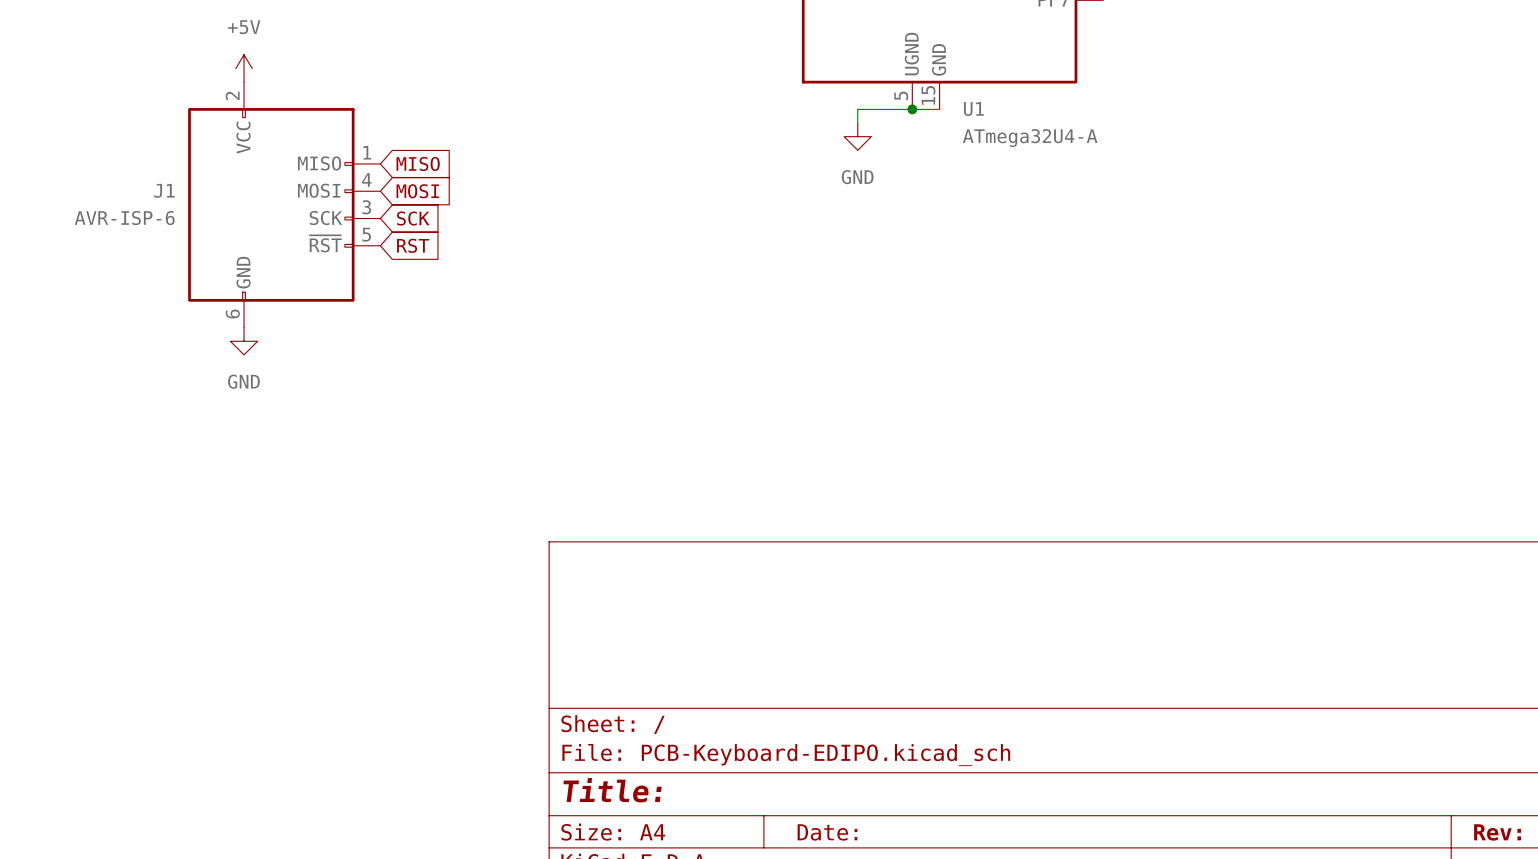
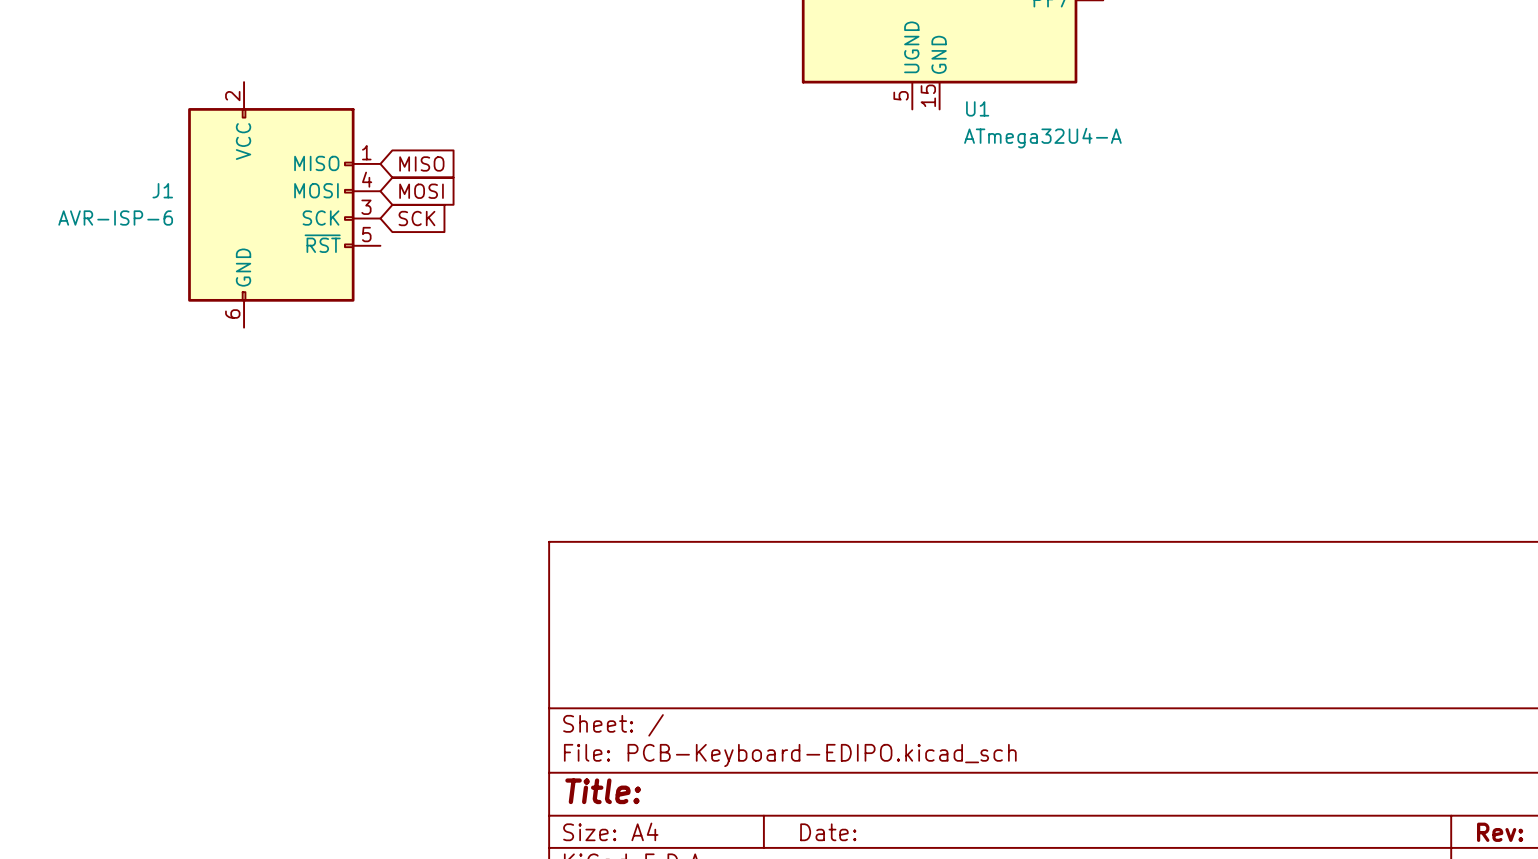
power symbol: +5V (244, 68) -> none
junction: (912, 109) -> none
wire: (939, 109) (857, 109) (857, 123) -> none
power symbol: GND (857, 136) -> none
global label: RST (413, 245) -> none
power symbol: GND (244, 341) -> none

